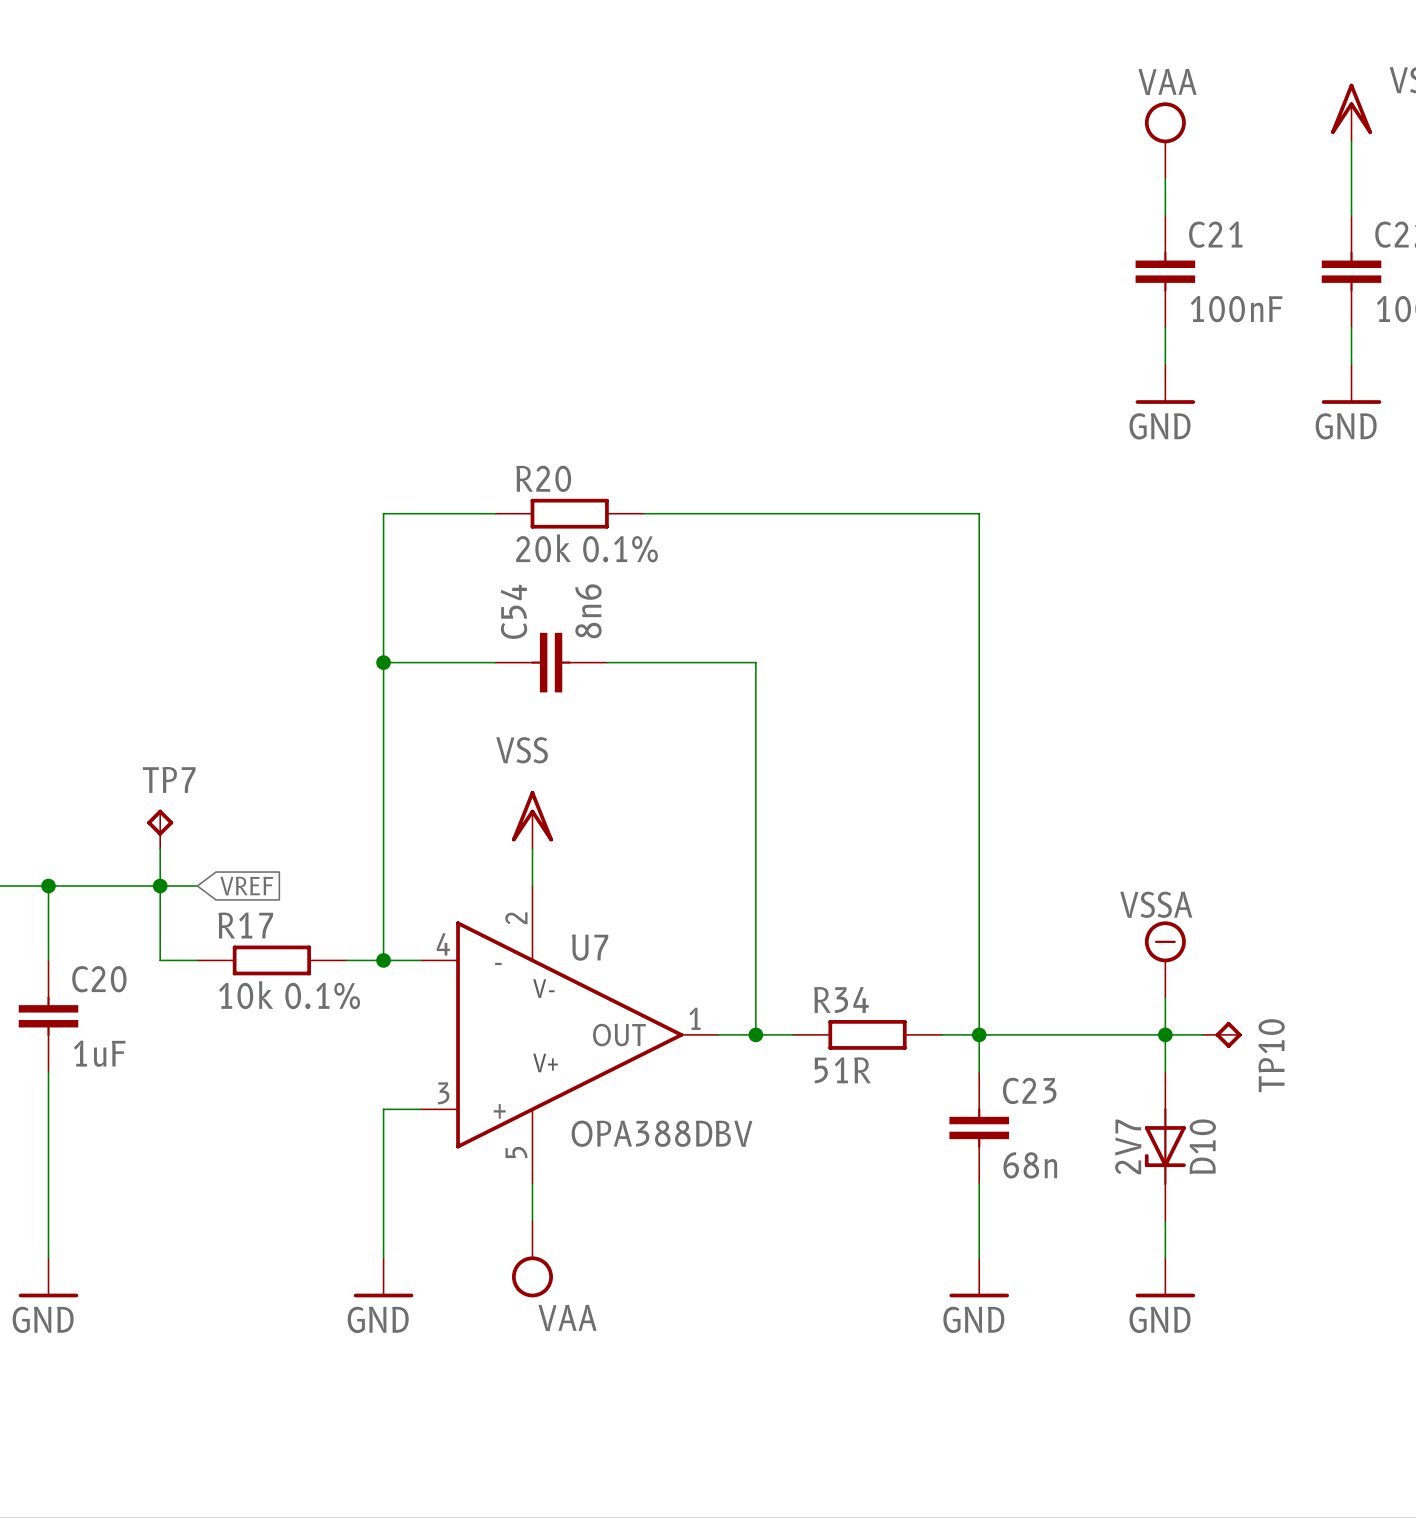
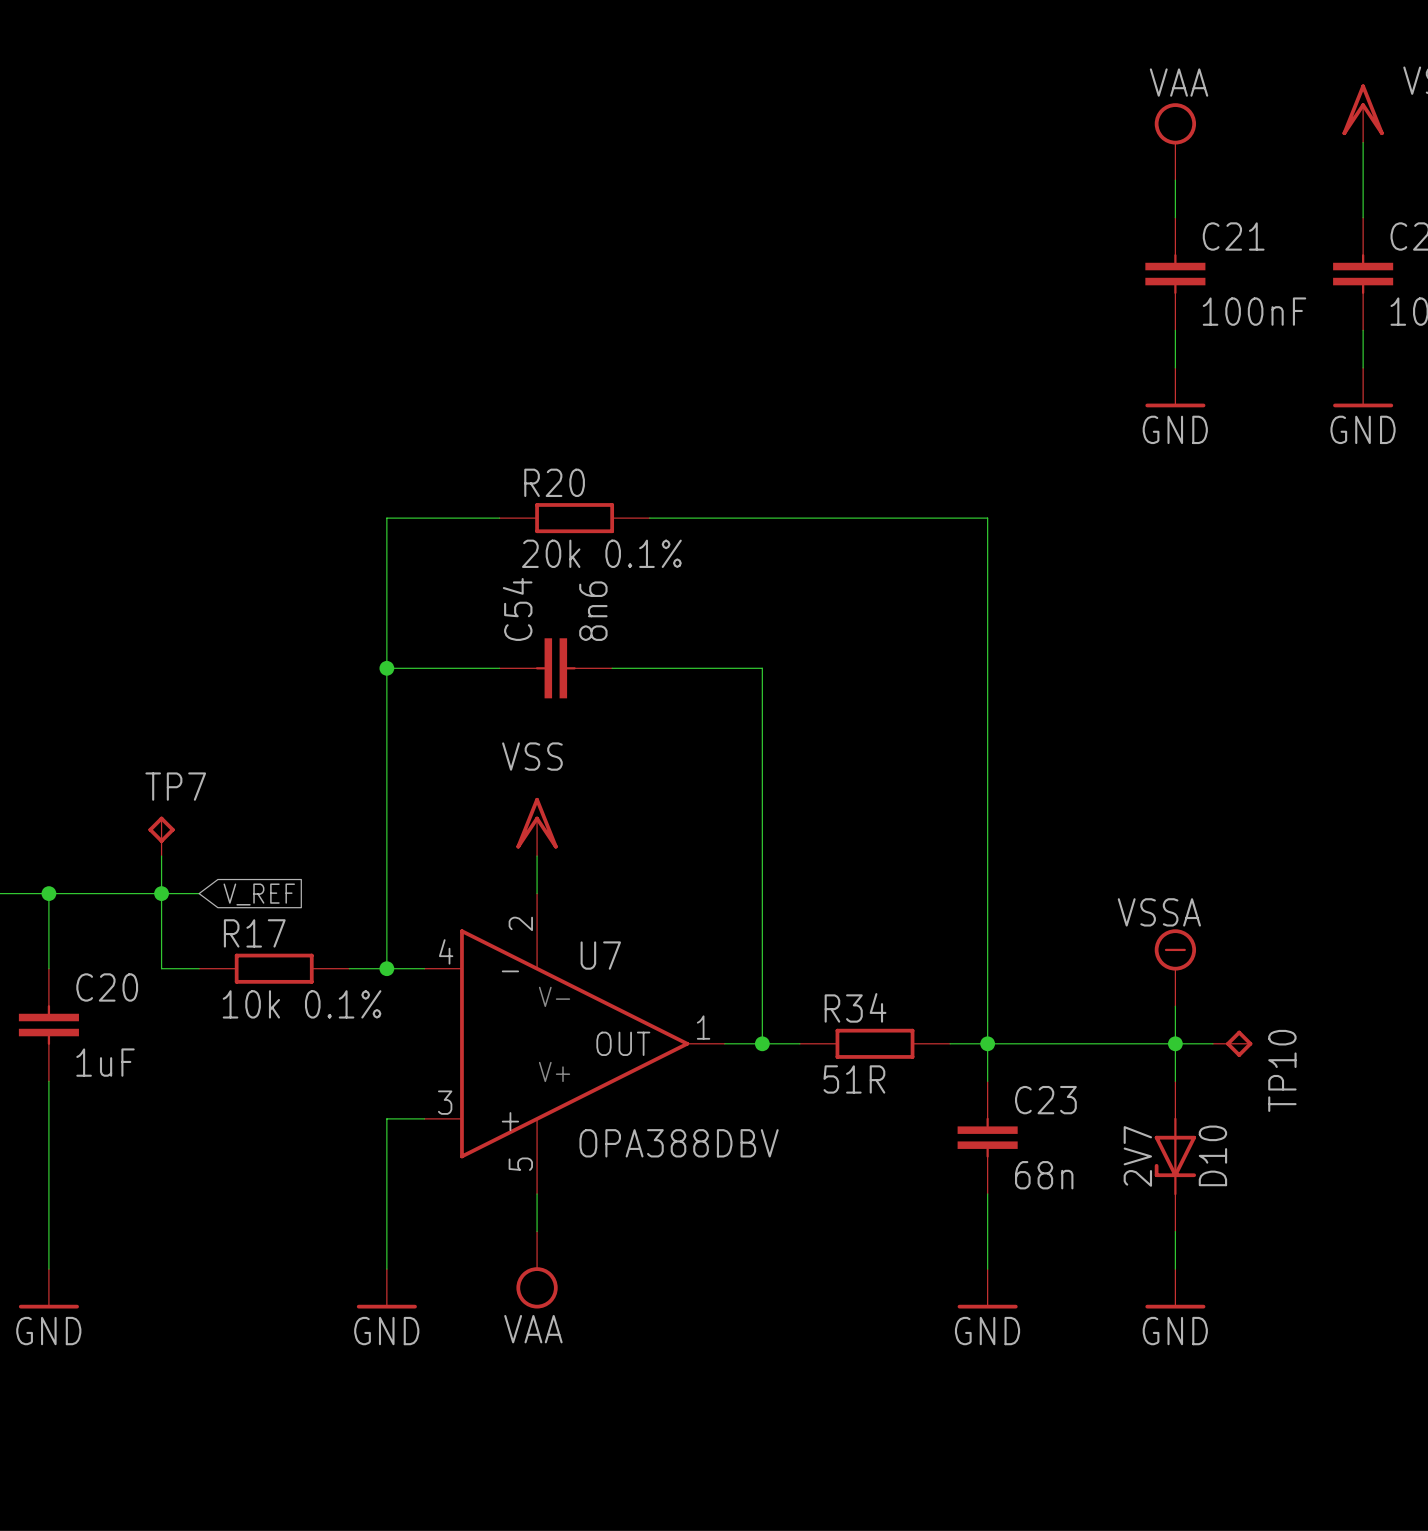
global label: VREF (246, 886) -> V_REF (259, 894)
power symbol text position: VAA (567, 1318) -> VAA (533, 1329)

